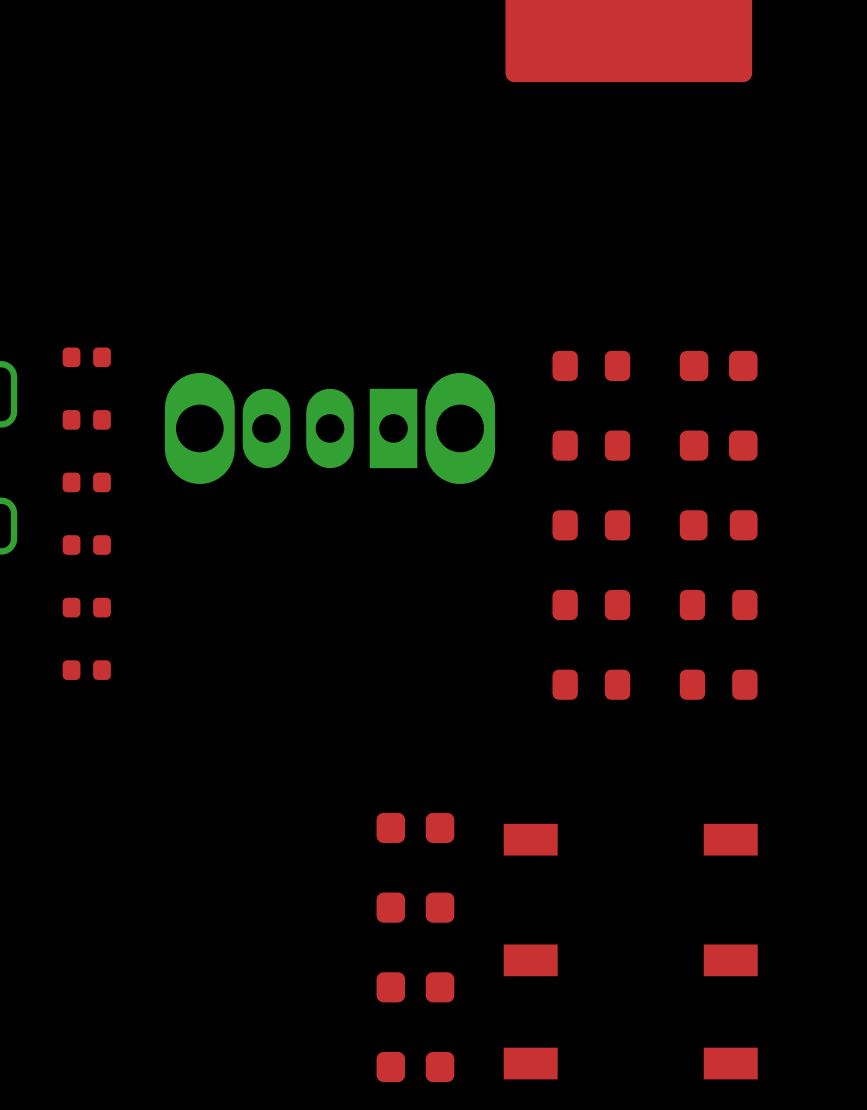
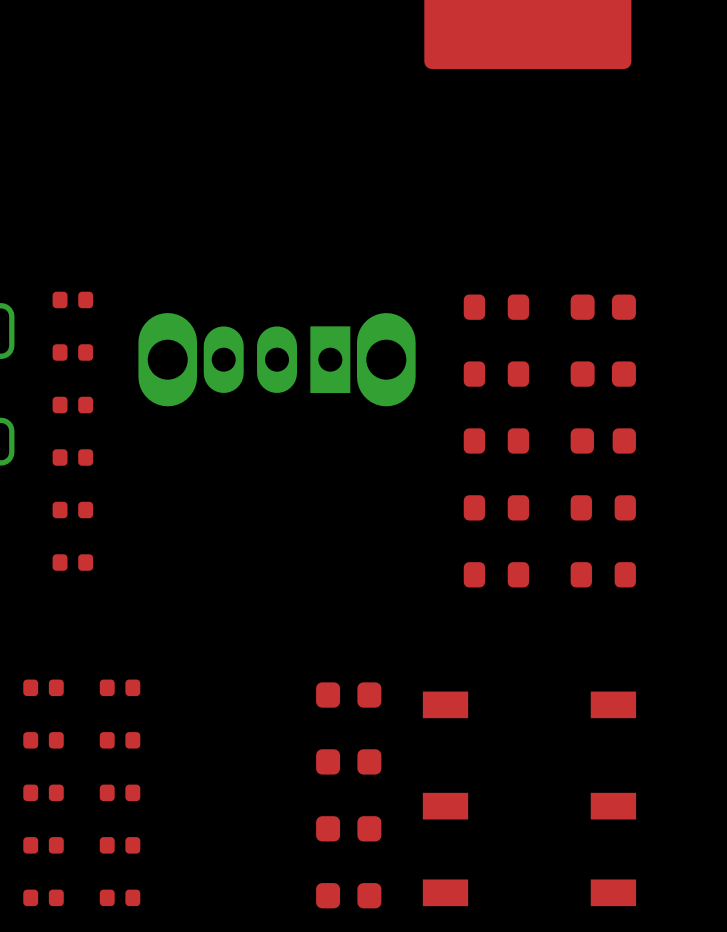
part: none -> (43, 687)
part: none -> (120, 687)
part: none -> (43, 740)
part: none -> (120, 740)
part: none -> (43, 792)
part: none -> (120, 792)
part: none -> (43, 845)
part: none -> (120, 845)
part: none -> (43, 897)
part: none -> (120, 897)

